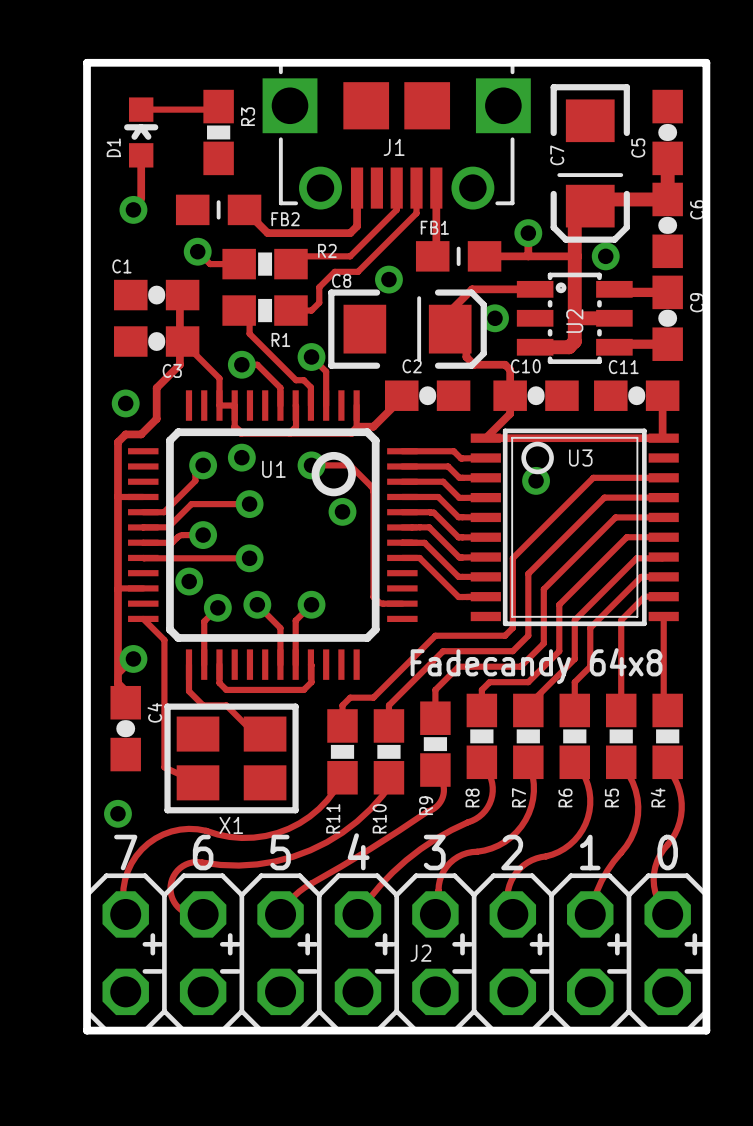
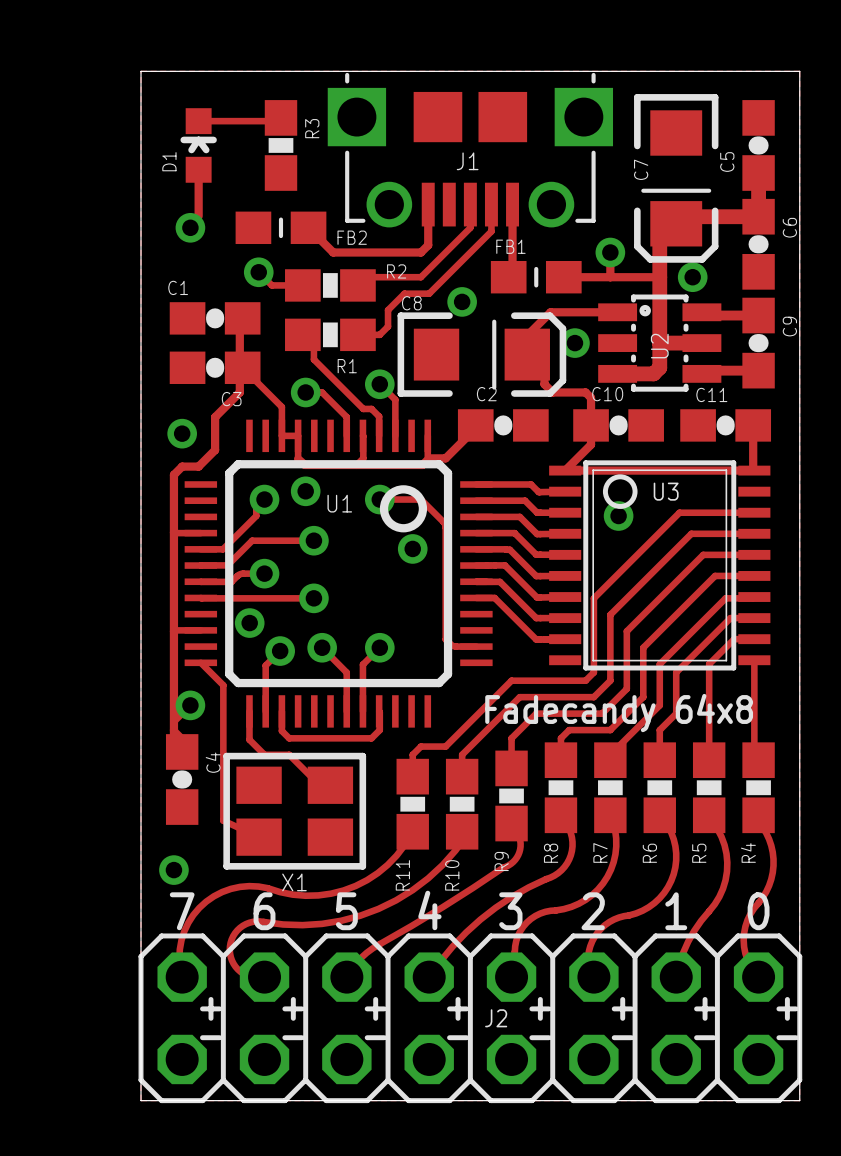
board edge width: thick (87, 62) (706, 62) (706, 1030) (87, 1030) (87, 62) -> thin (141, 71) (799, 71) (799, 1100) (141, 1100) (141, 71)

